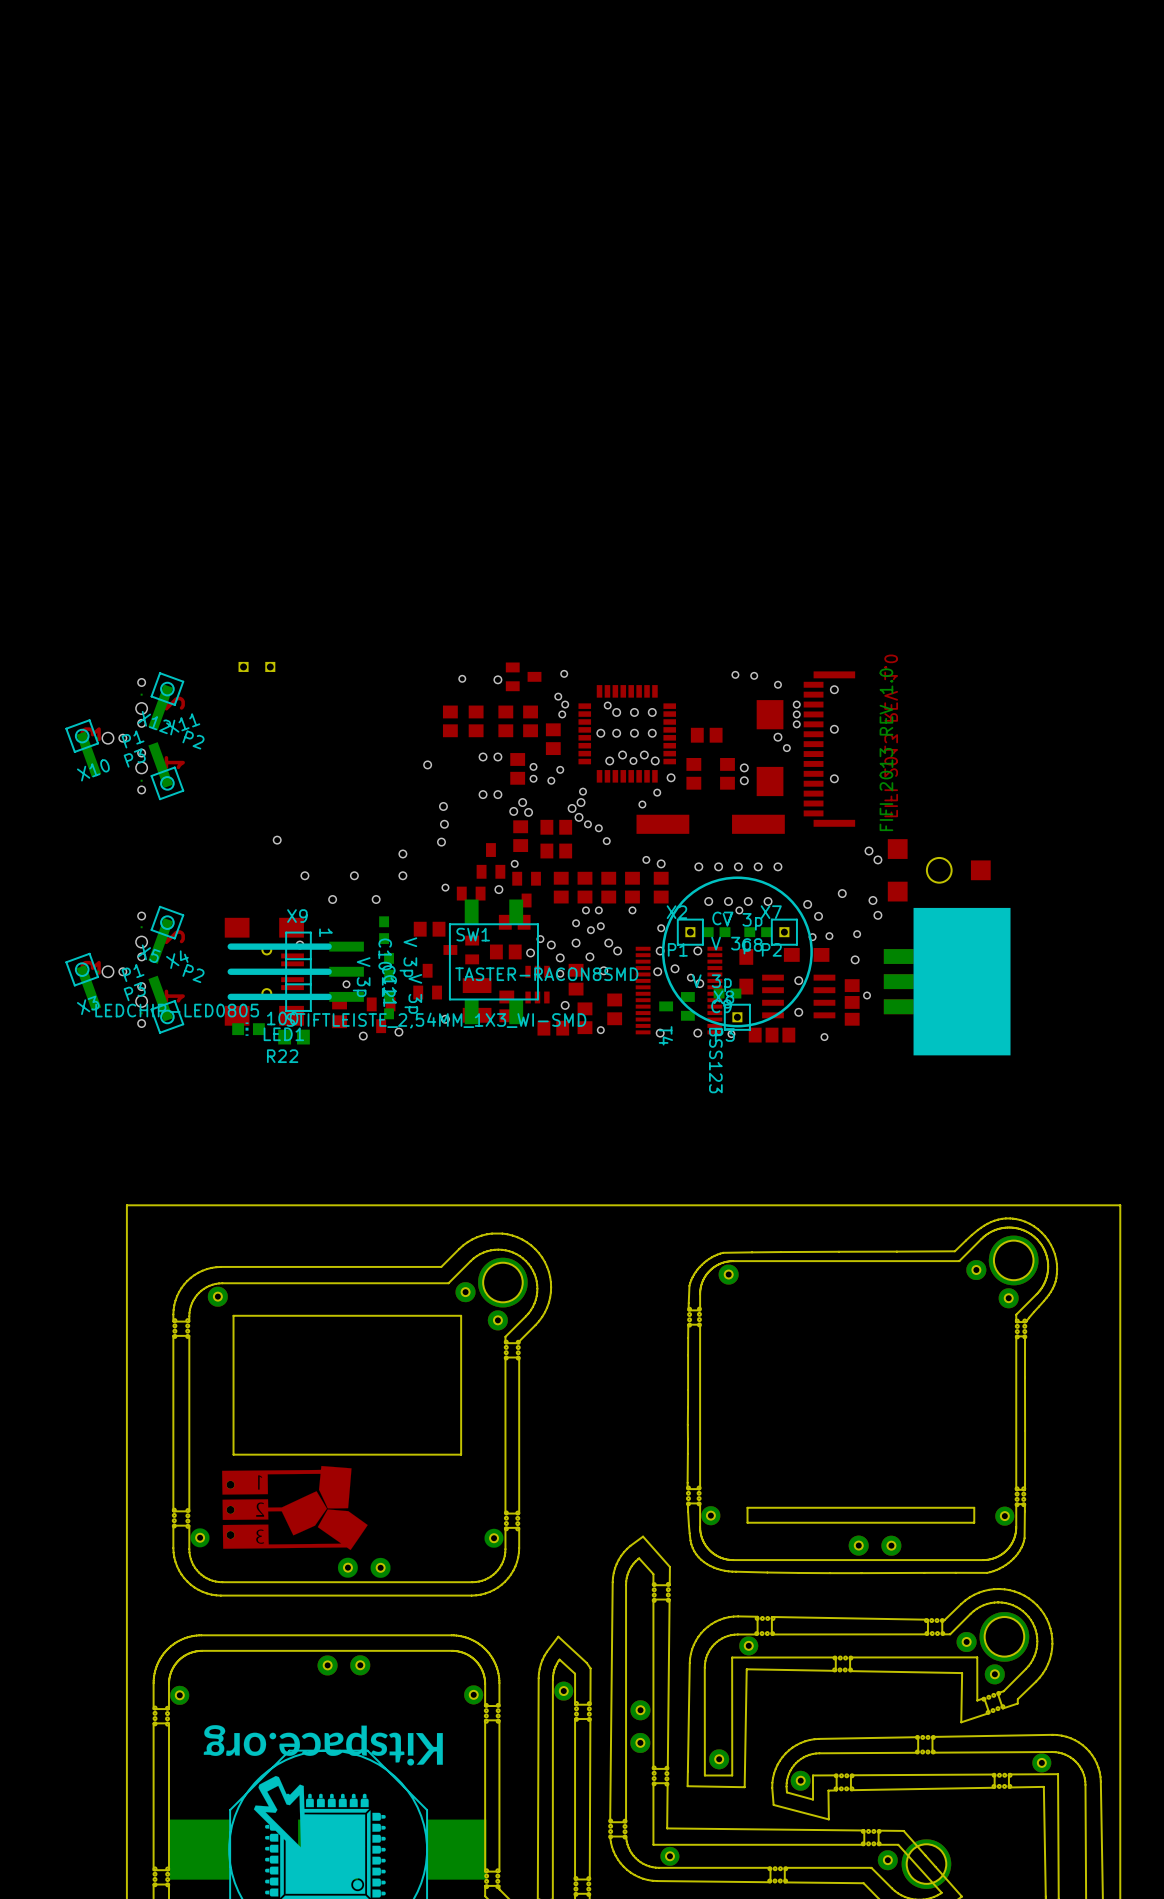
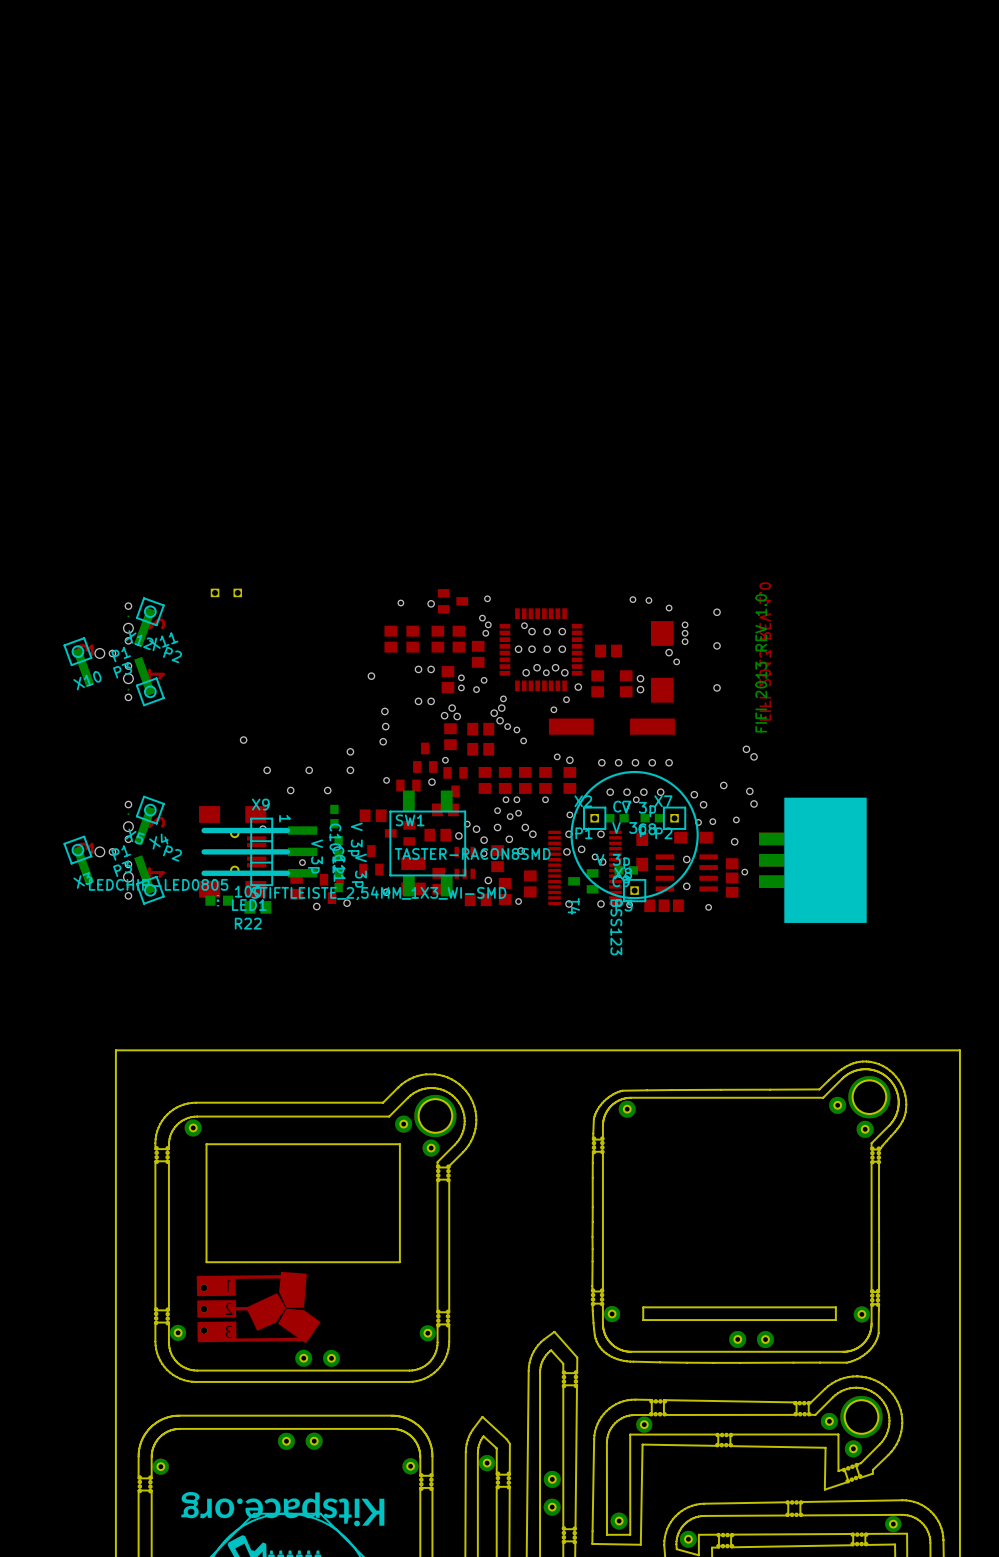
part: (829, 749) -> none
part: (939, 870) -> none

